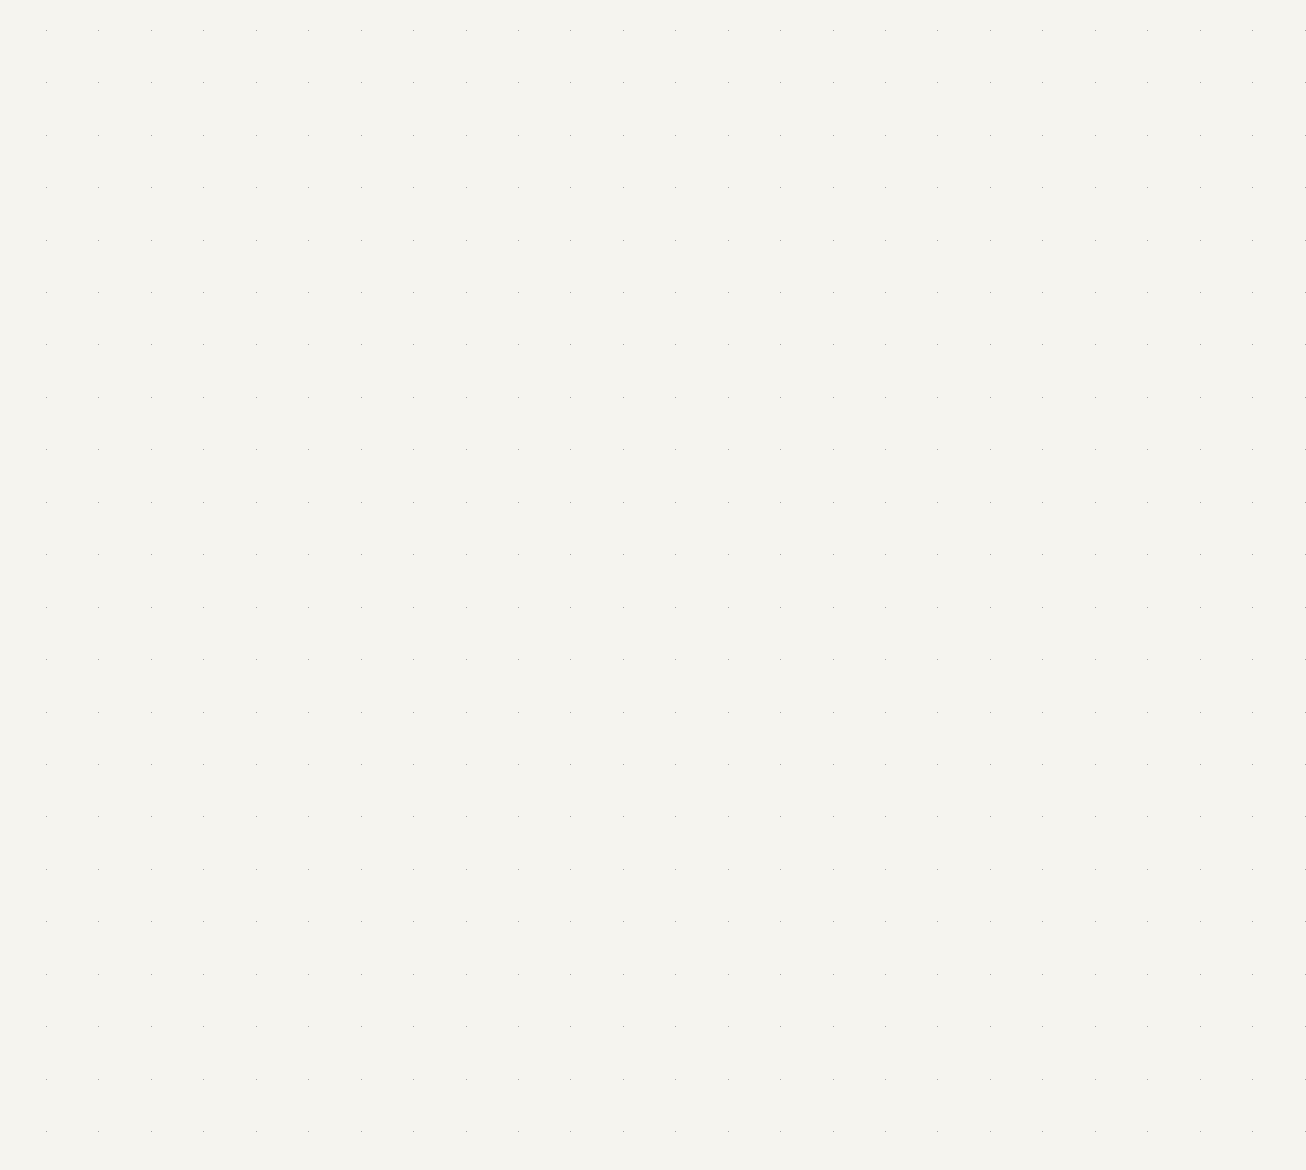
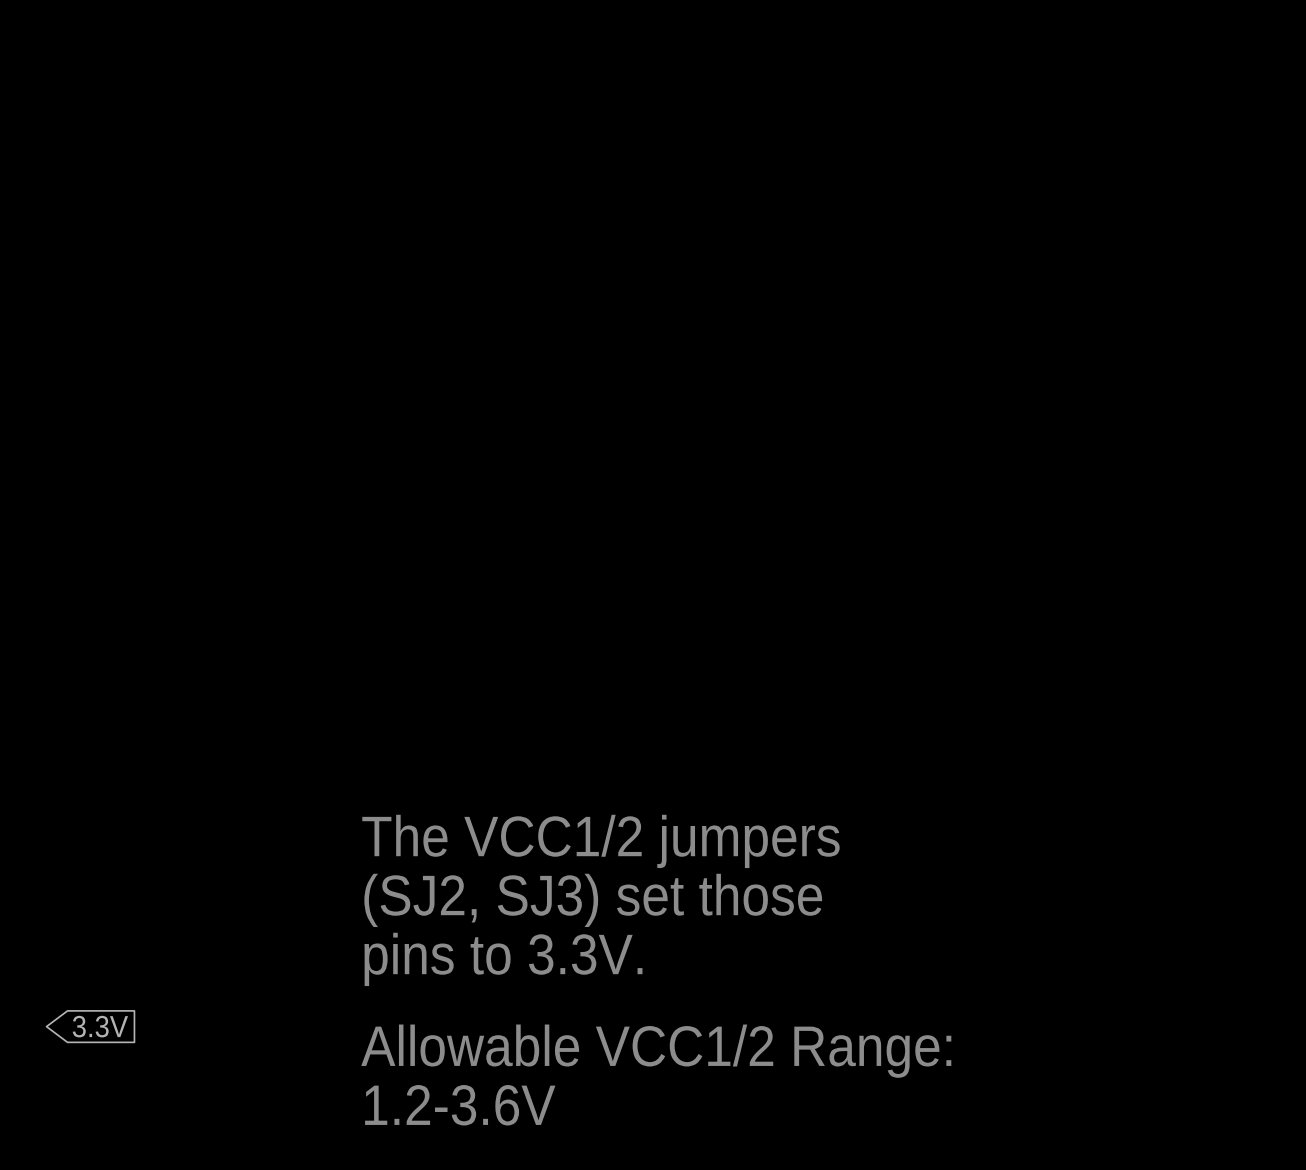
text: none -> The VCC1/2 jumpers (600, 841)
text: none -> (SJ2, SJ3) set those (593, 900)
text: none -> pins to 3.3V. (503, 959)
global label: none -> 3.3V (100, 1026)
text: none -> Allowable VCC1/2 Range: (656, 1051)
text: none -> 1.2-3.6V (460, 1105)

